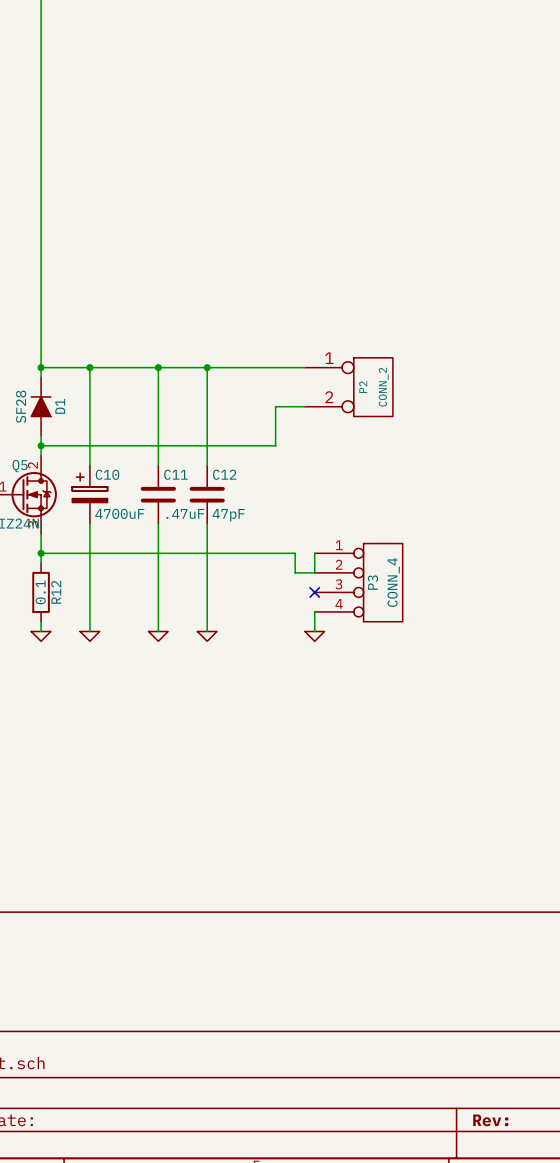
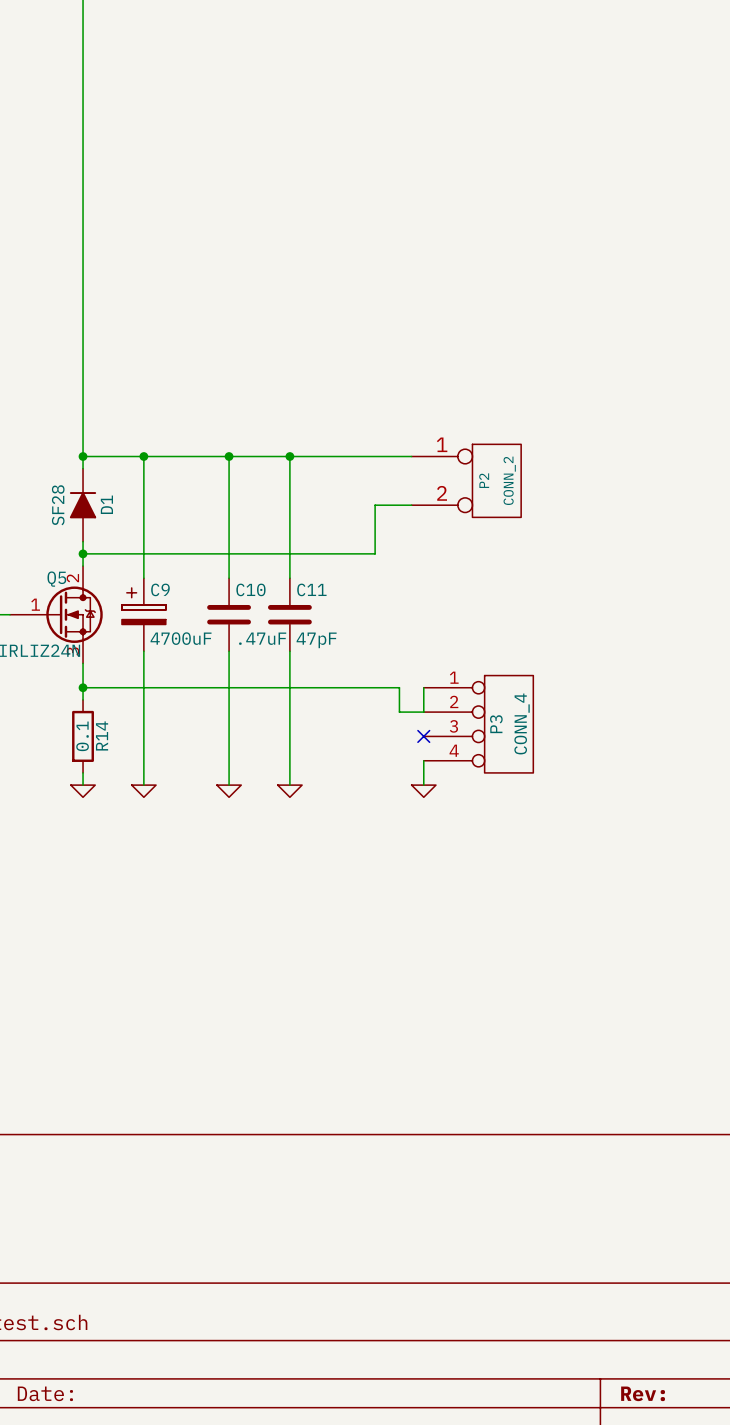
C10 name: C10 (107, 474) -> C9 (160, 589)
C11 name: C11 (175, 474) -> C10 (250, 589)
C12 name: C12 (224, 474) -> C11 (311, 589)
R12 name: R12 (56, 592) -> R14 (102, 735)

